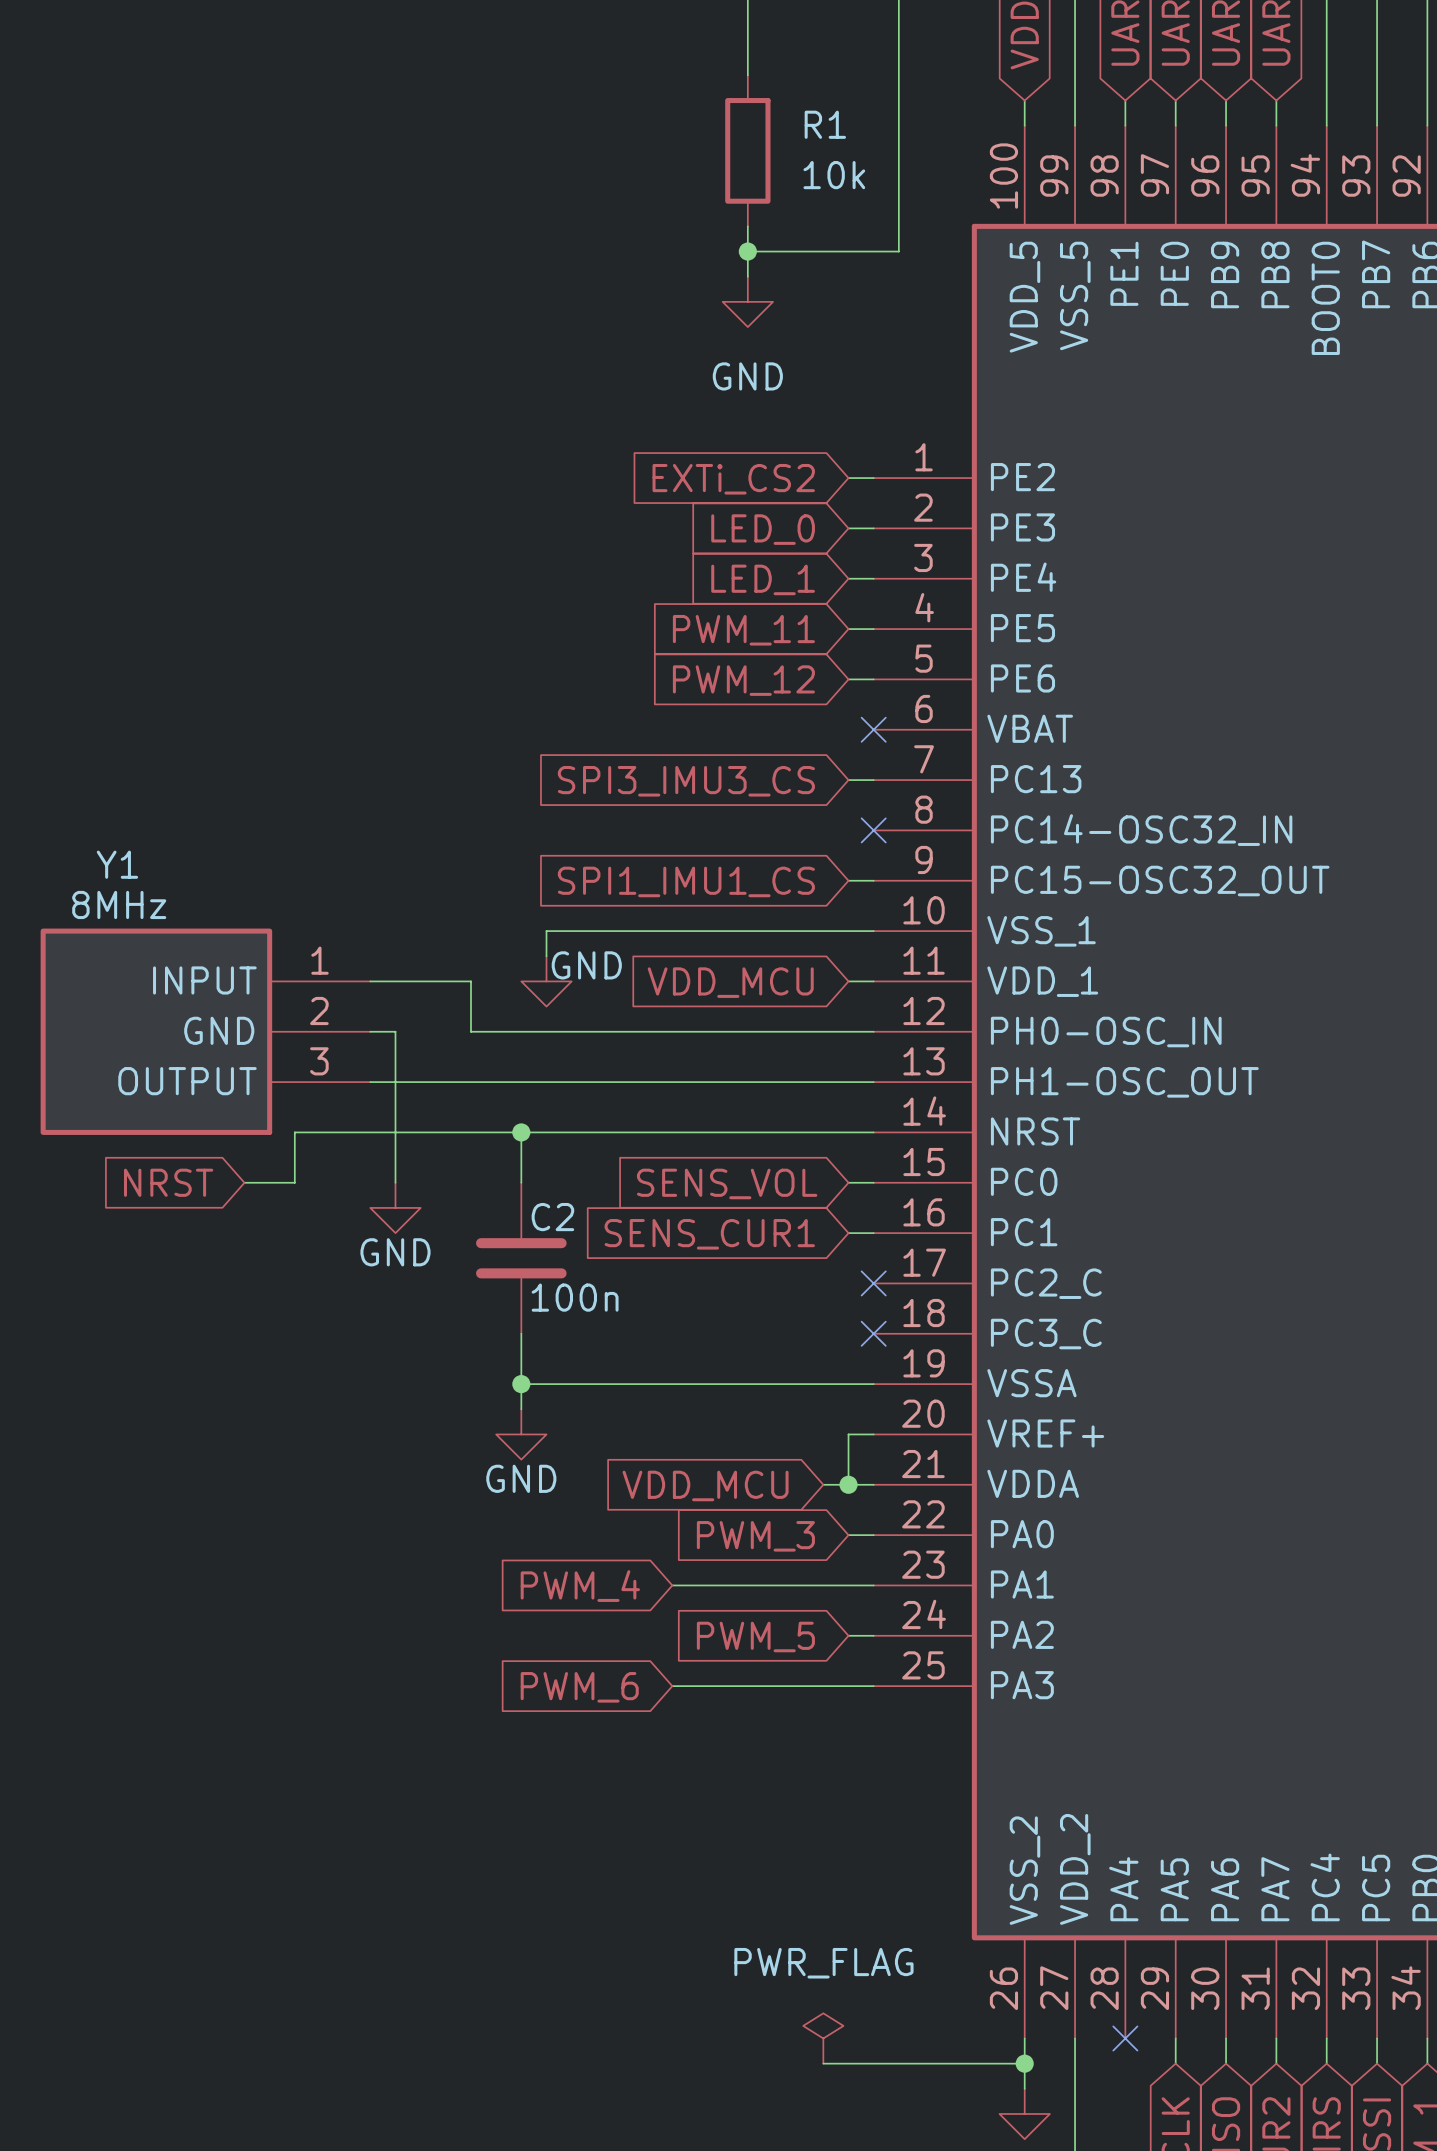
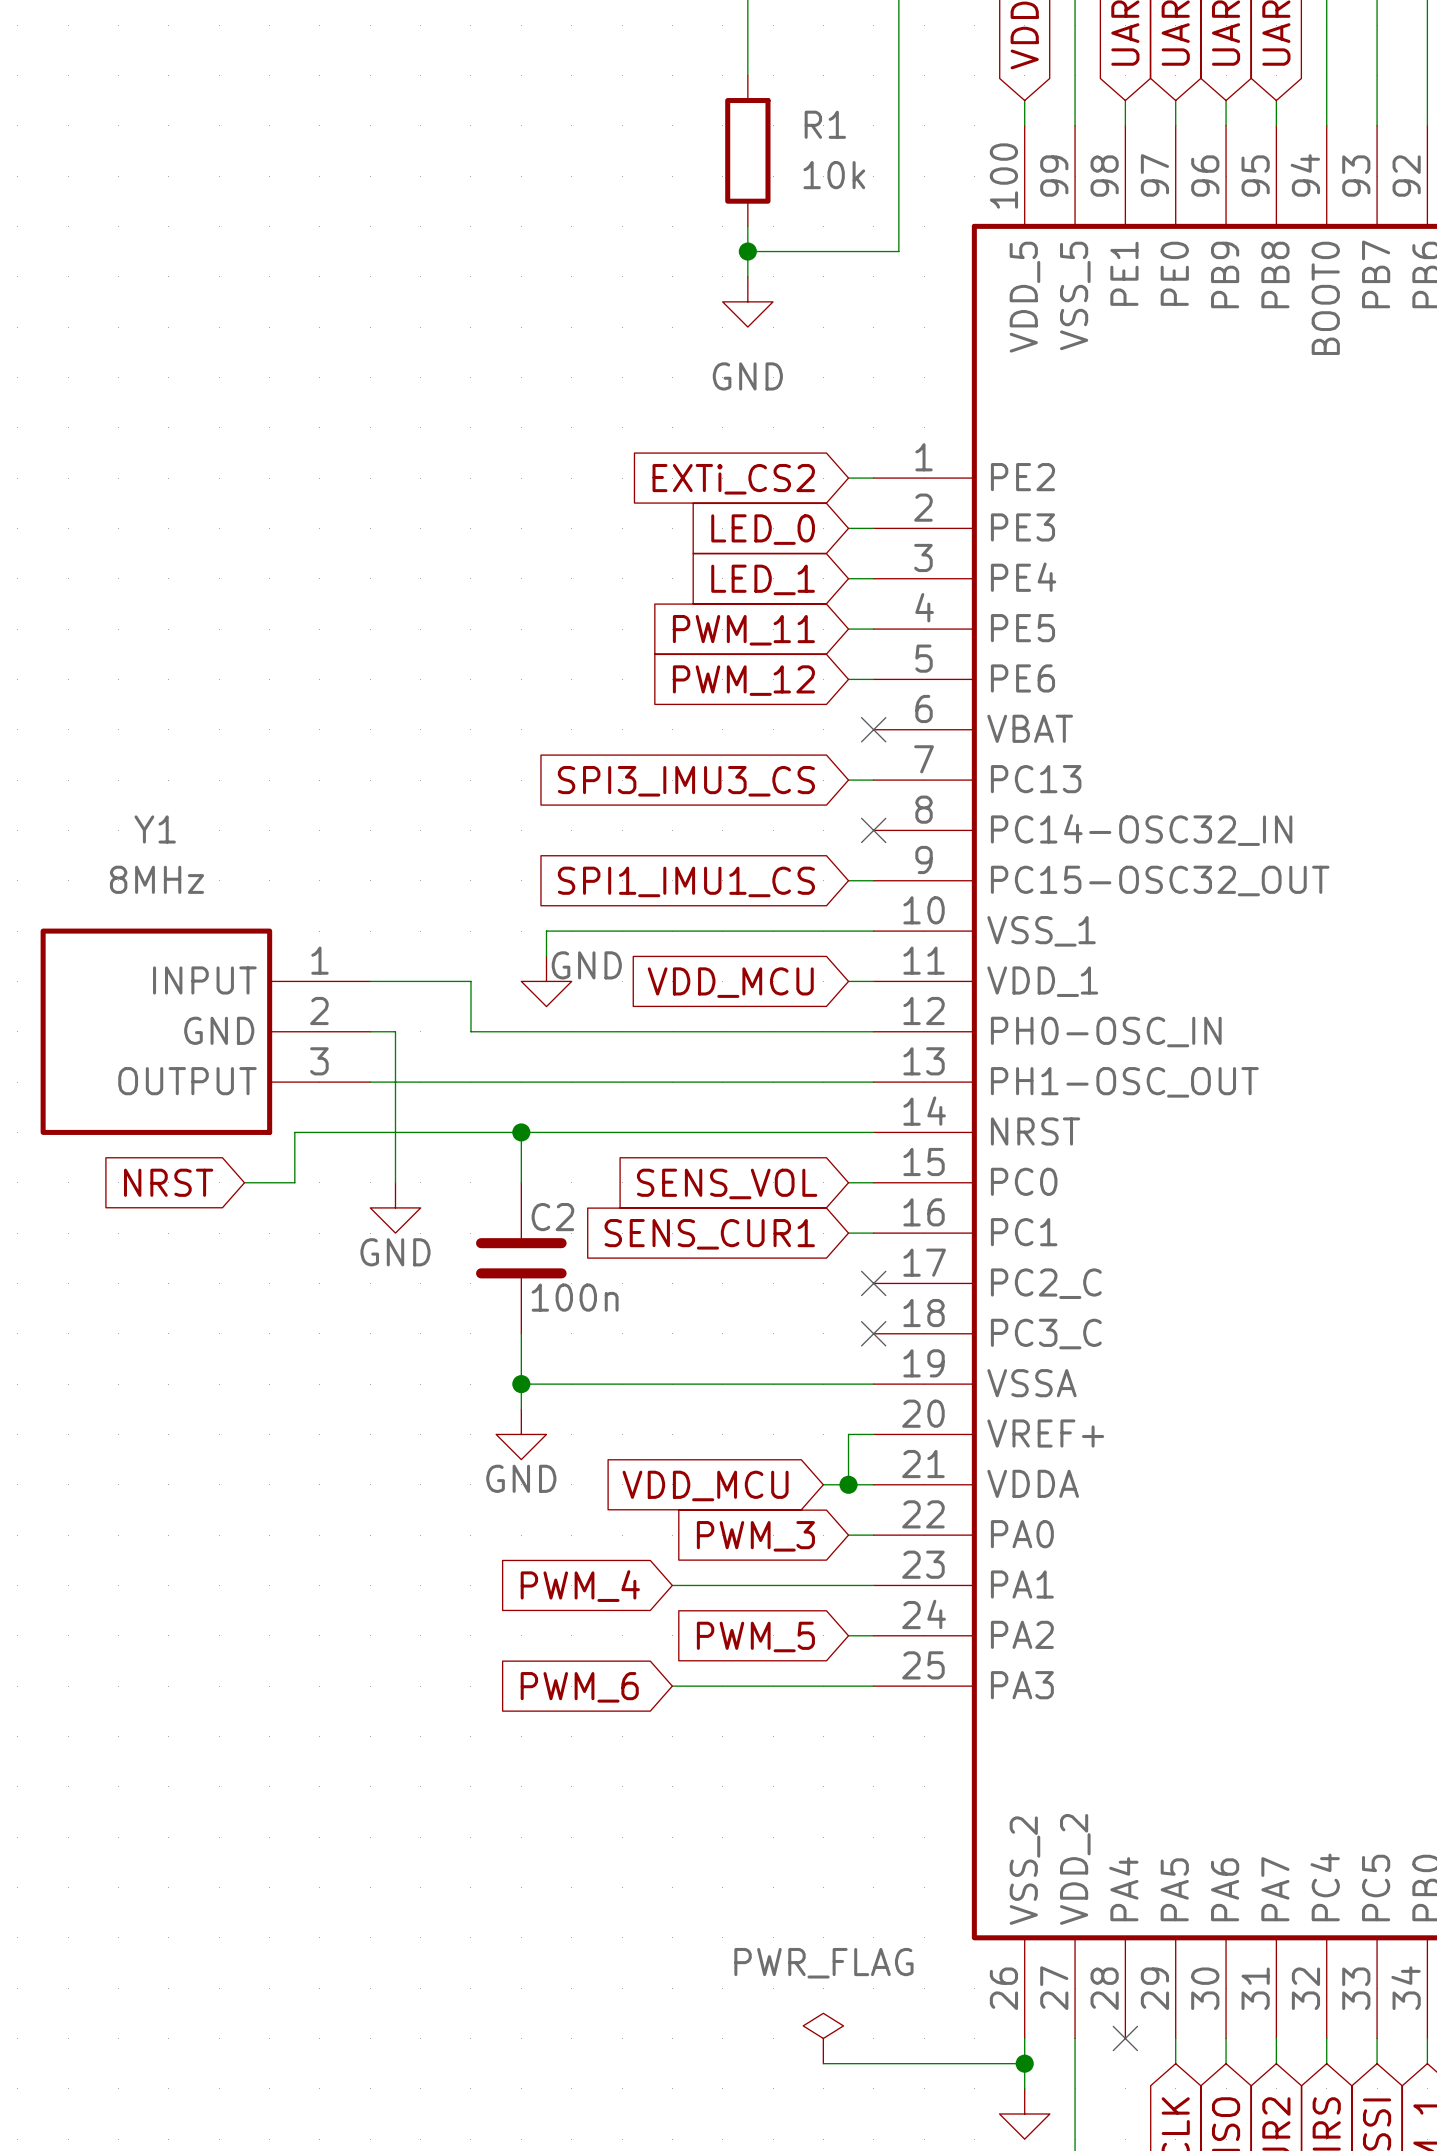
Y1 name position: Y1 (117, 864) -> Y1 (155, 829)
Y1 value position: 8MHz (119, 904) -> 8MHz (156, 879)

